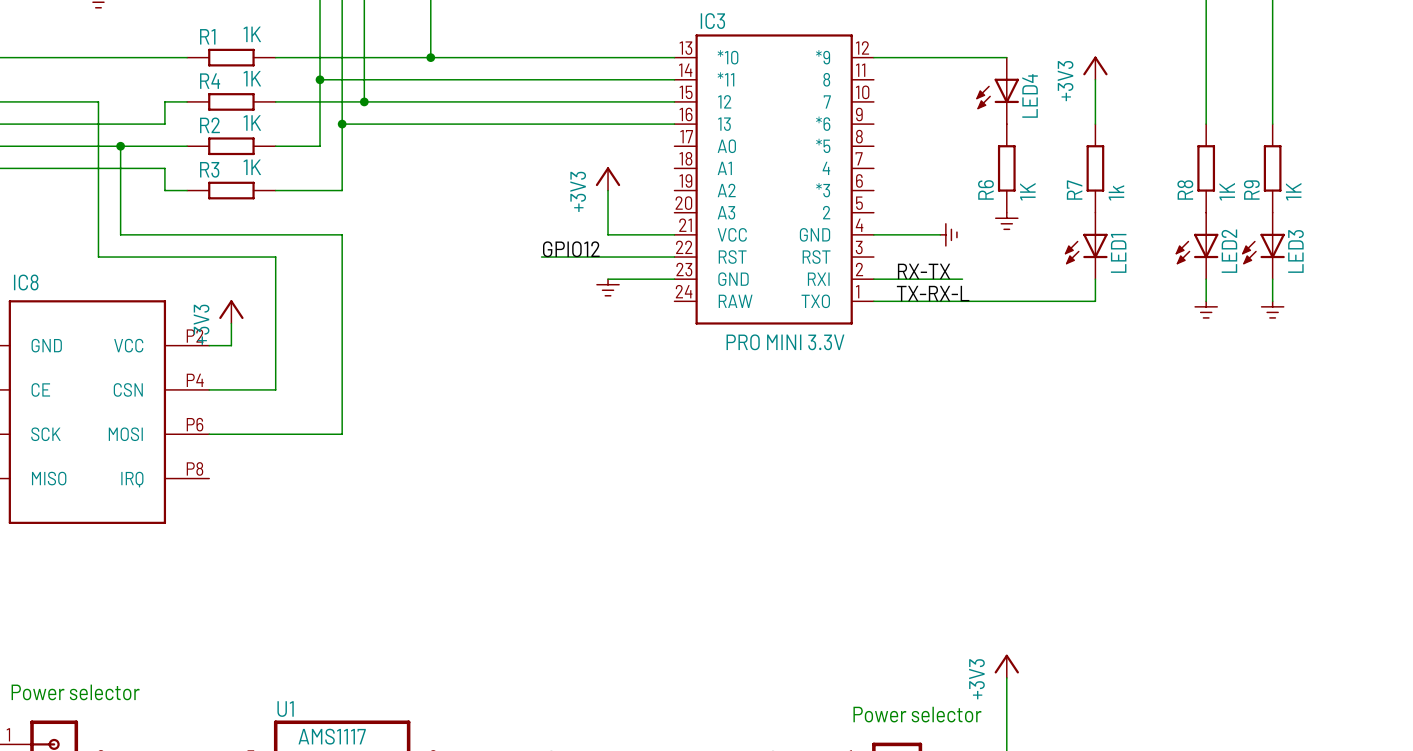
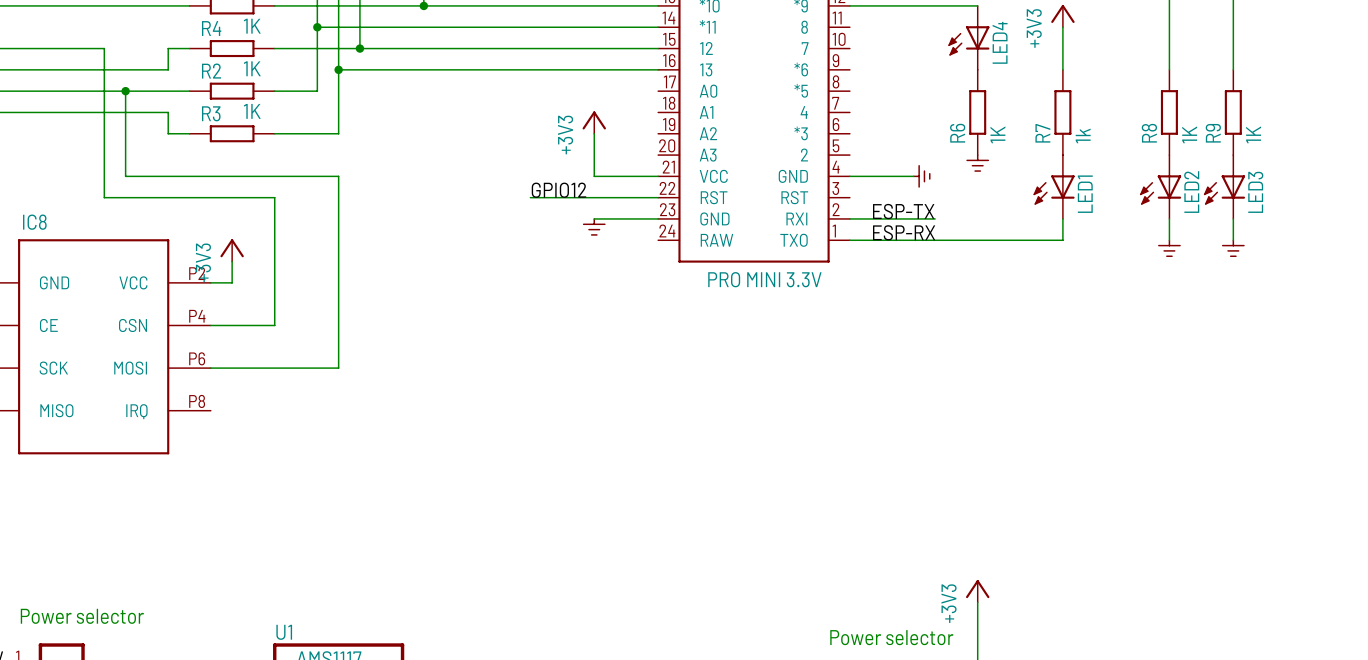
label: RX-TX (924, 271) -> ESP-TX (903, 211)
label: TX-RX-L (933, 293) -> ESP-RX (904, 232)

